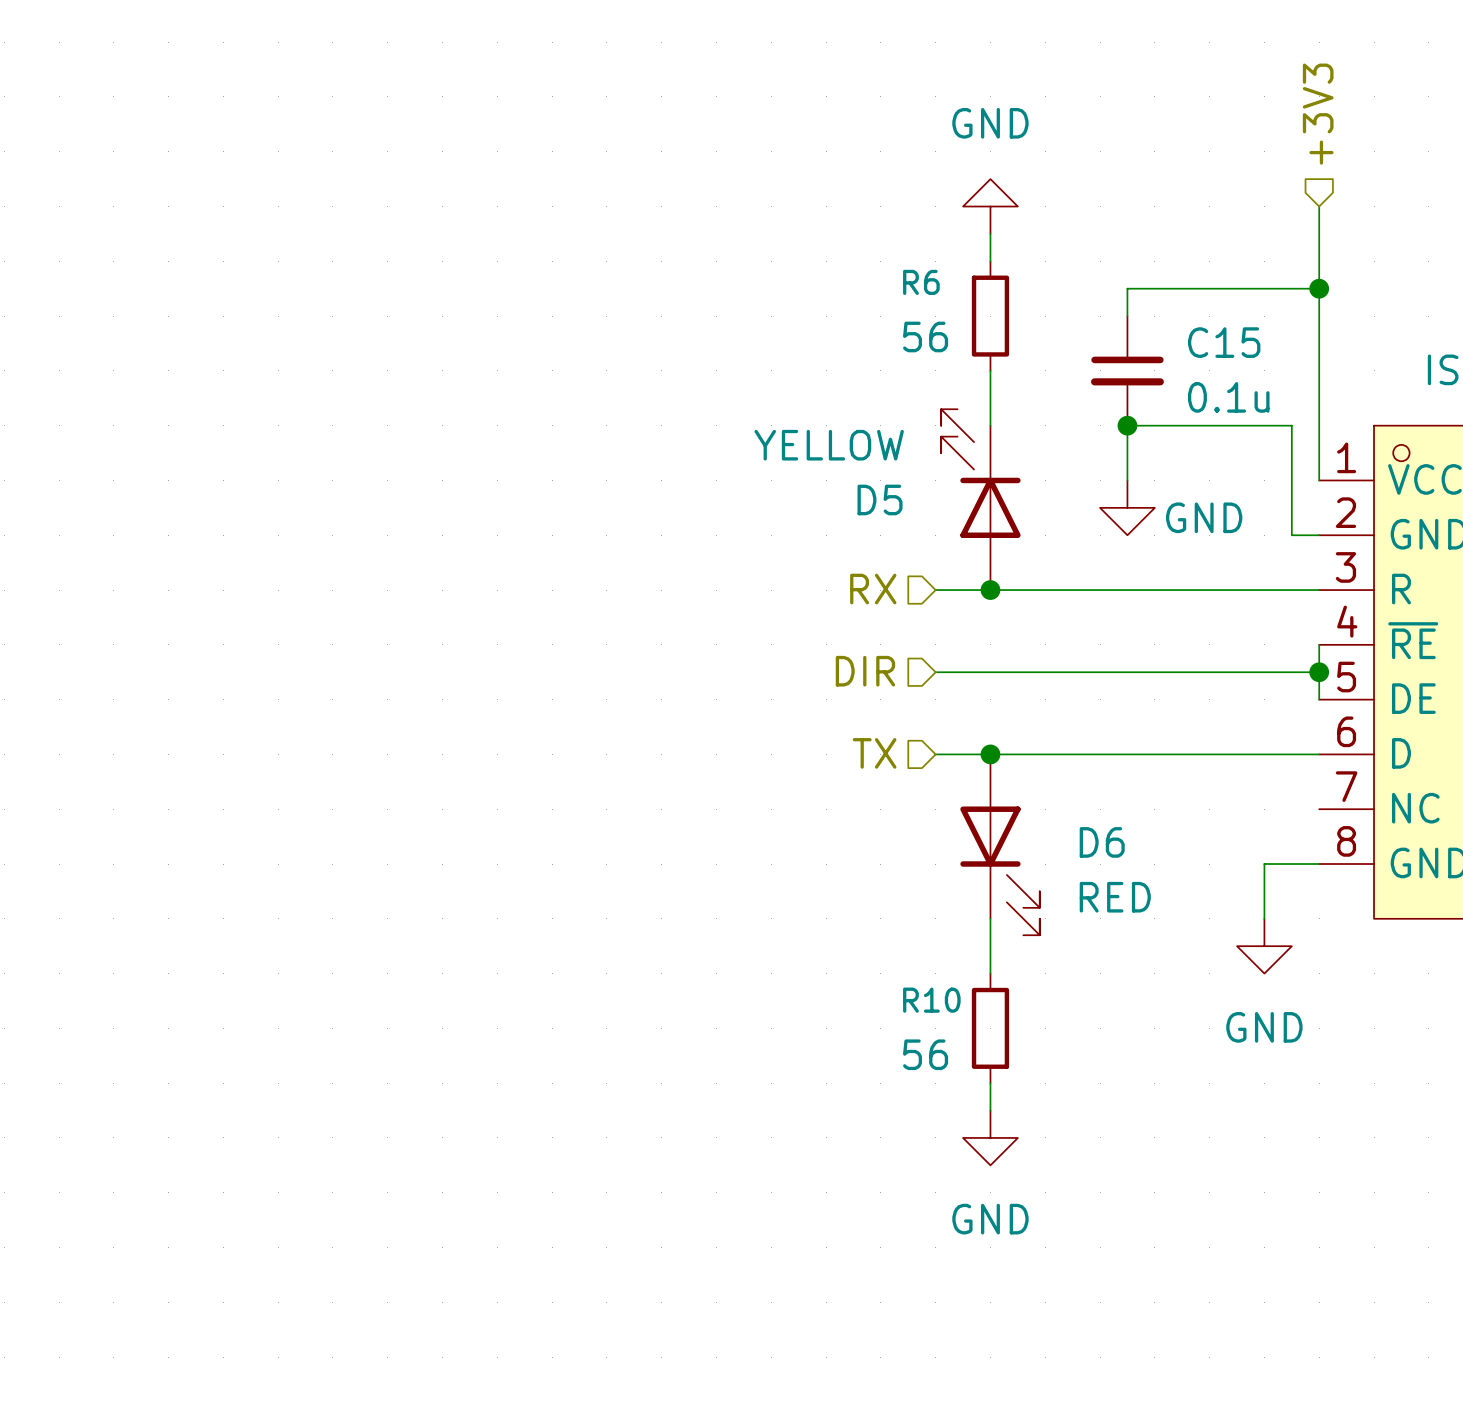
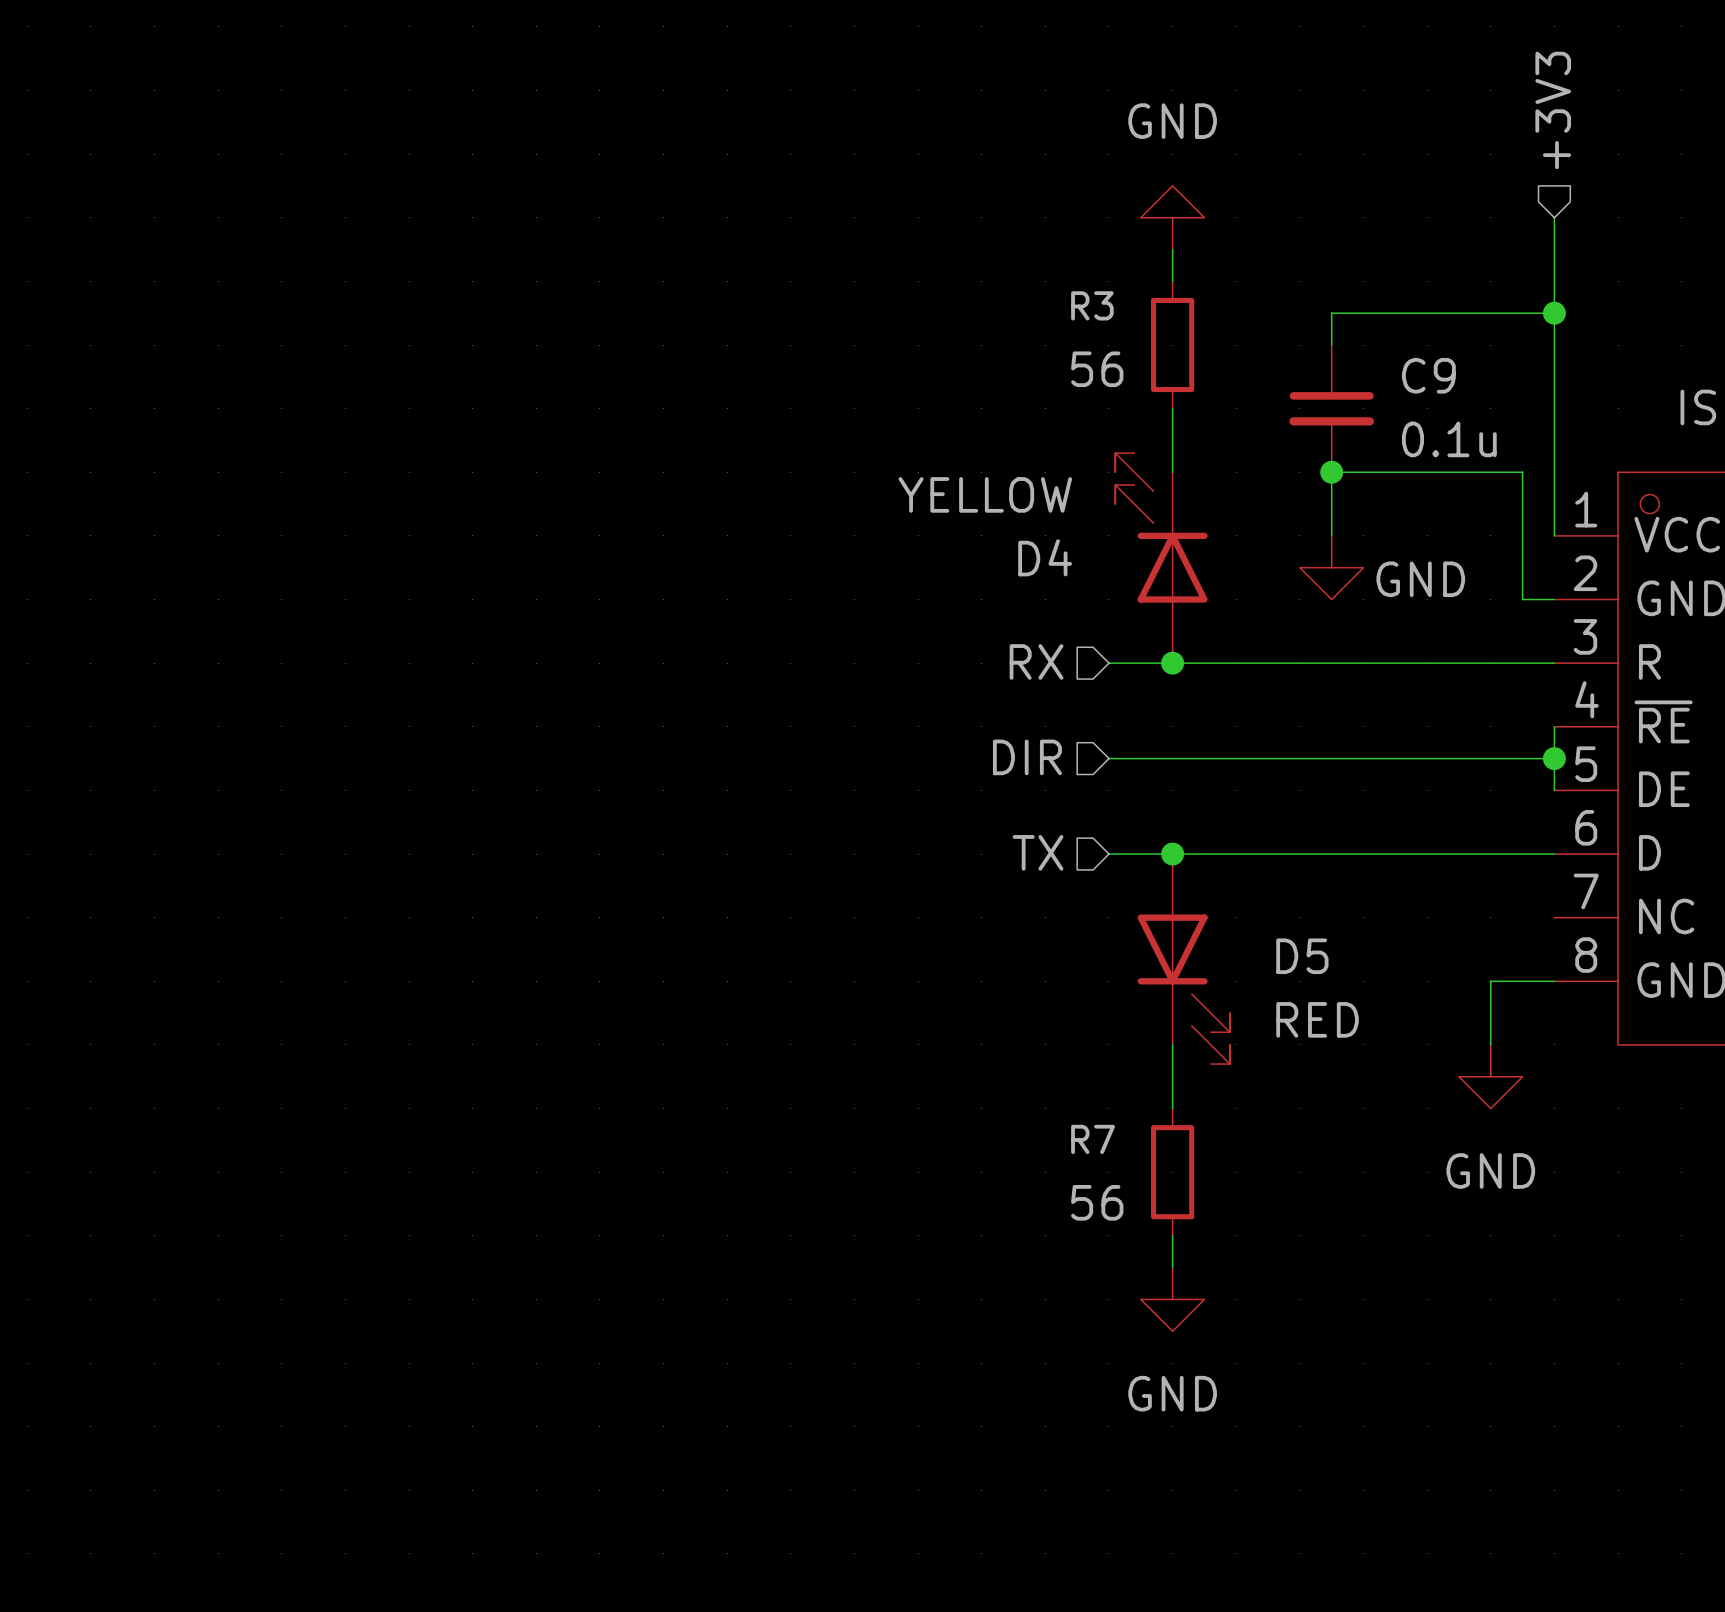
R6 name: R6 (921, 282) -> R3 (1092, 305)
C15 name: C15 (1224, 342) -> C9 (1428, 375)
D5 name: D5 (880, 499) -> D4 (1045, 557)
D6 name: D6 (1102, 842) -> D5 (1302, 956)
R10 name: R10 (931, 1000) -> R7 (1093, 1139)

